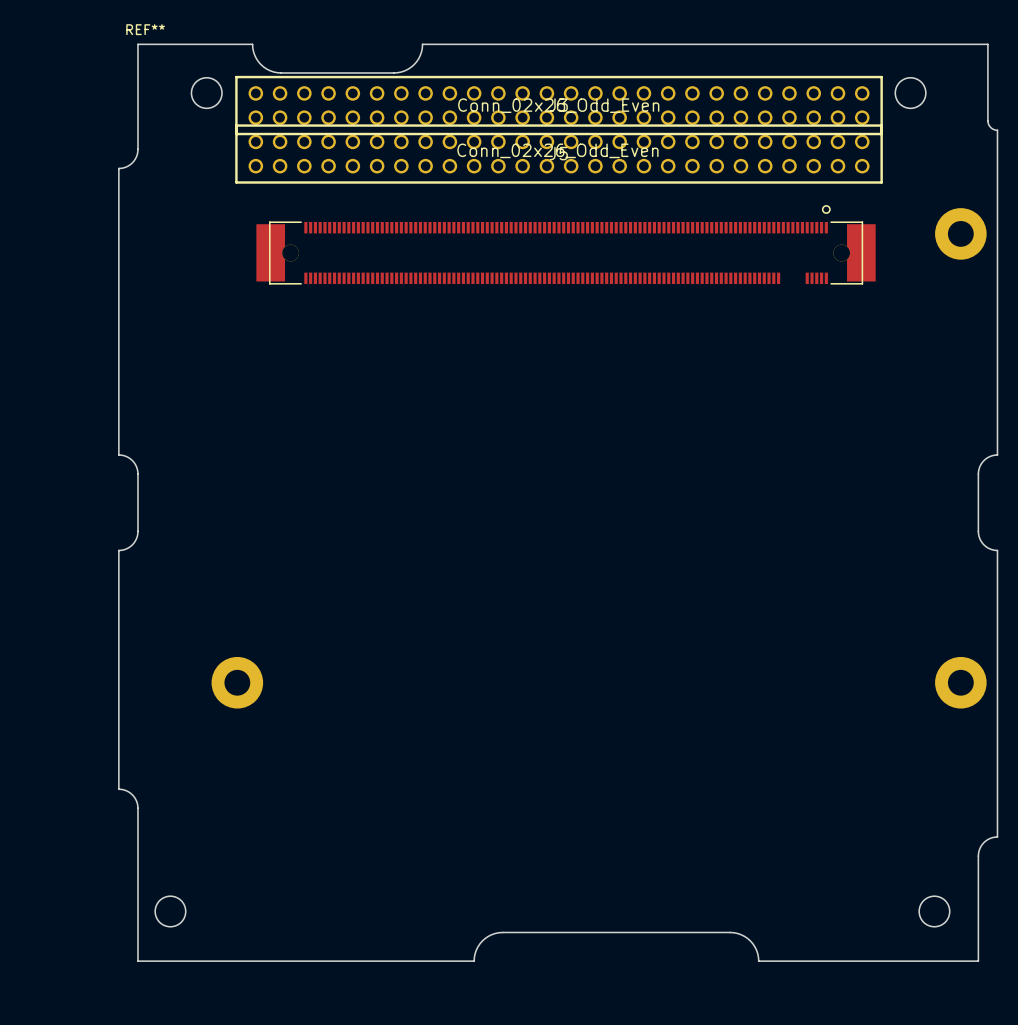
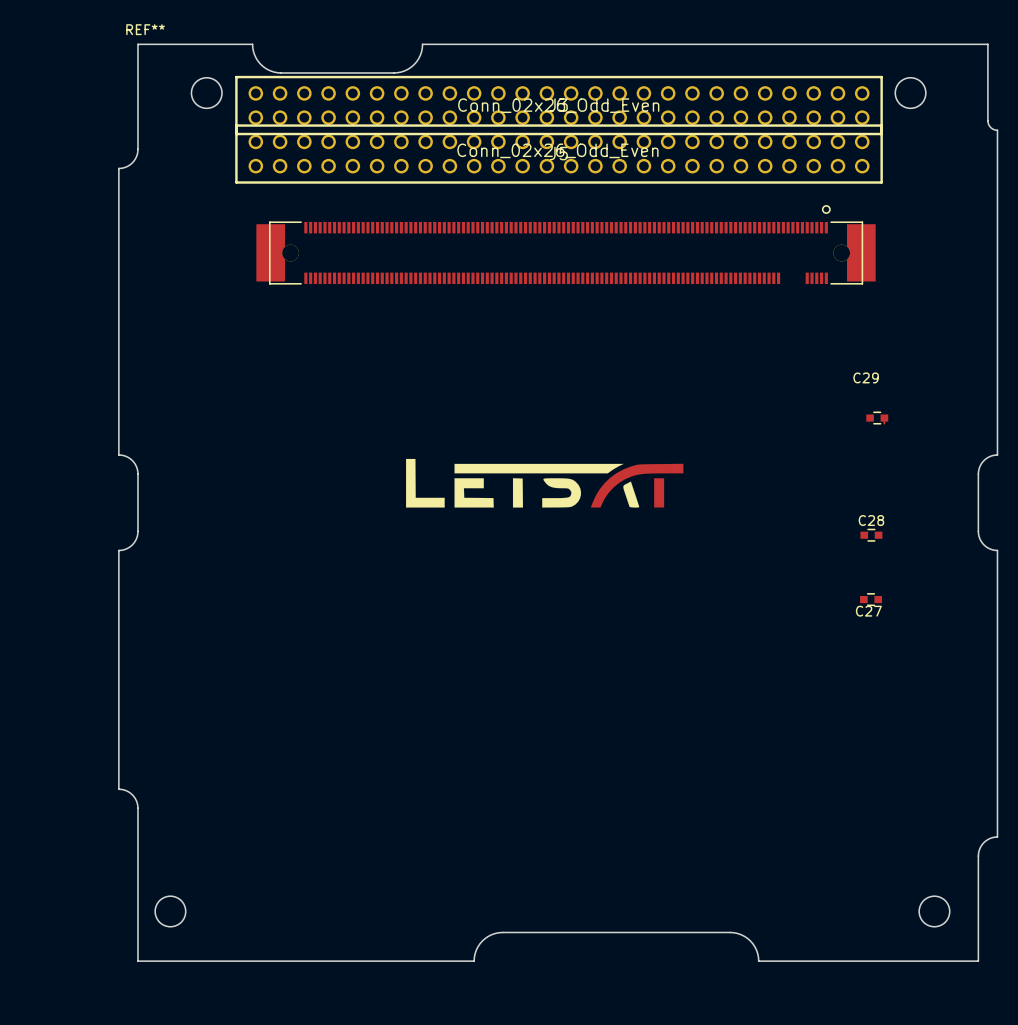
part: (960, 233) -> none
C29: none -> (877, 418)
track: none -> (884, 418) (884, 423)
drawing: none -> [406, 458, 684, 508]
C28: none -> (871, 535)
C27: none -> (871, 599)
part: (237, 682) -> none
part: (960, 682) -> none

